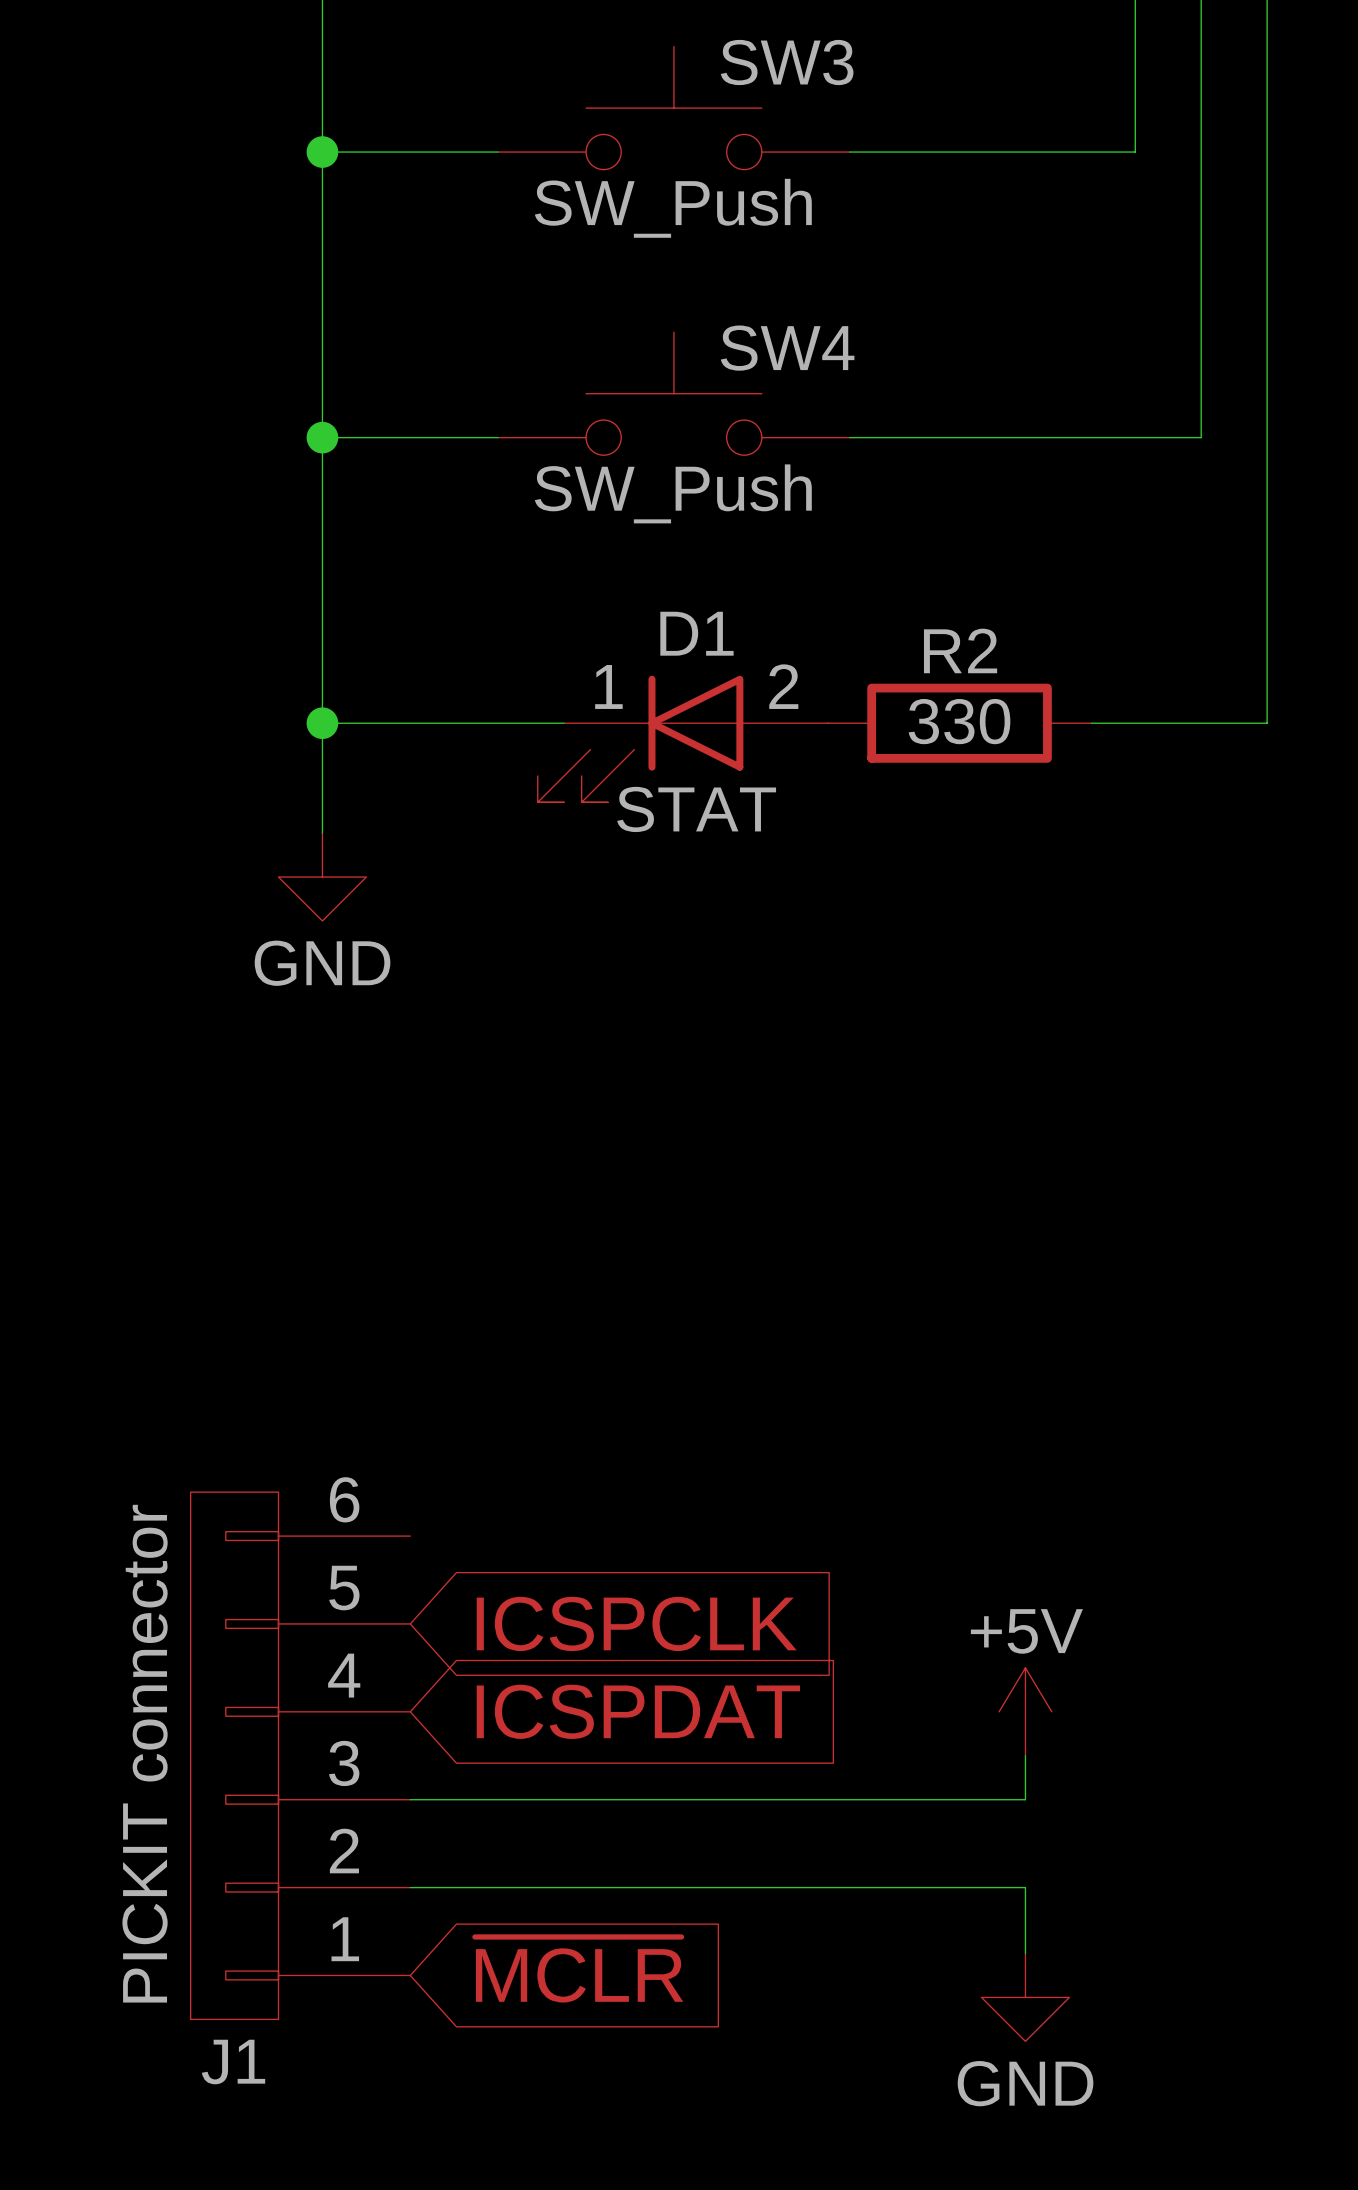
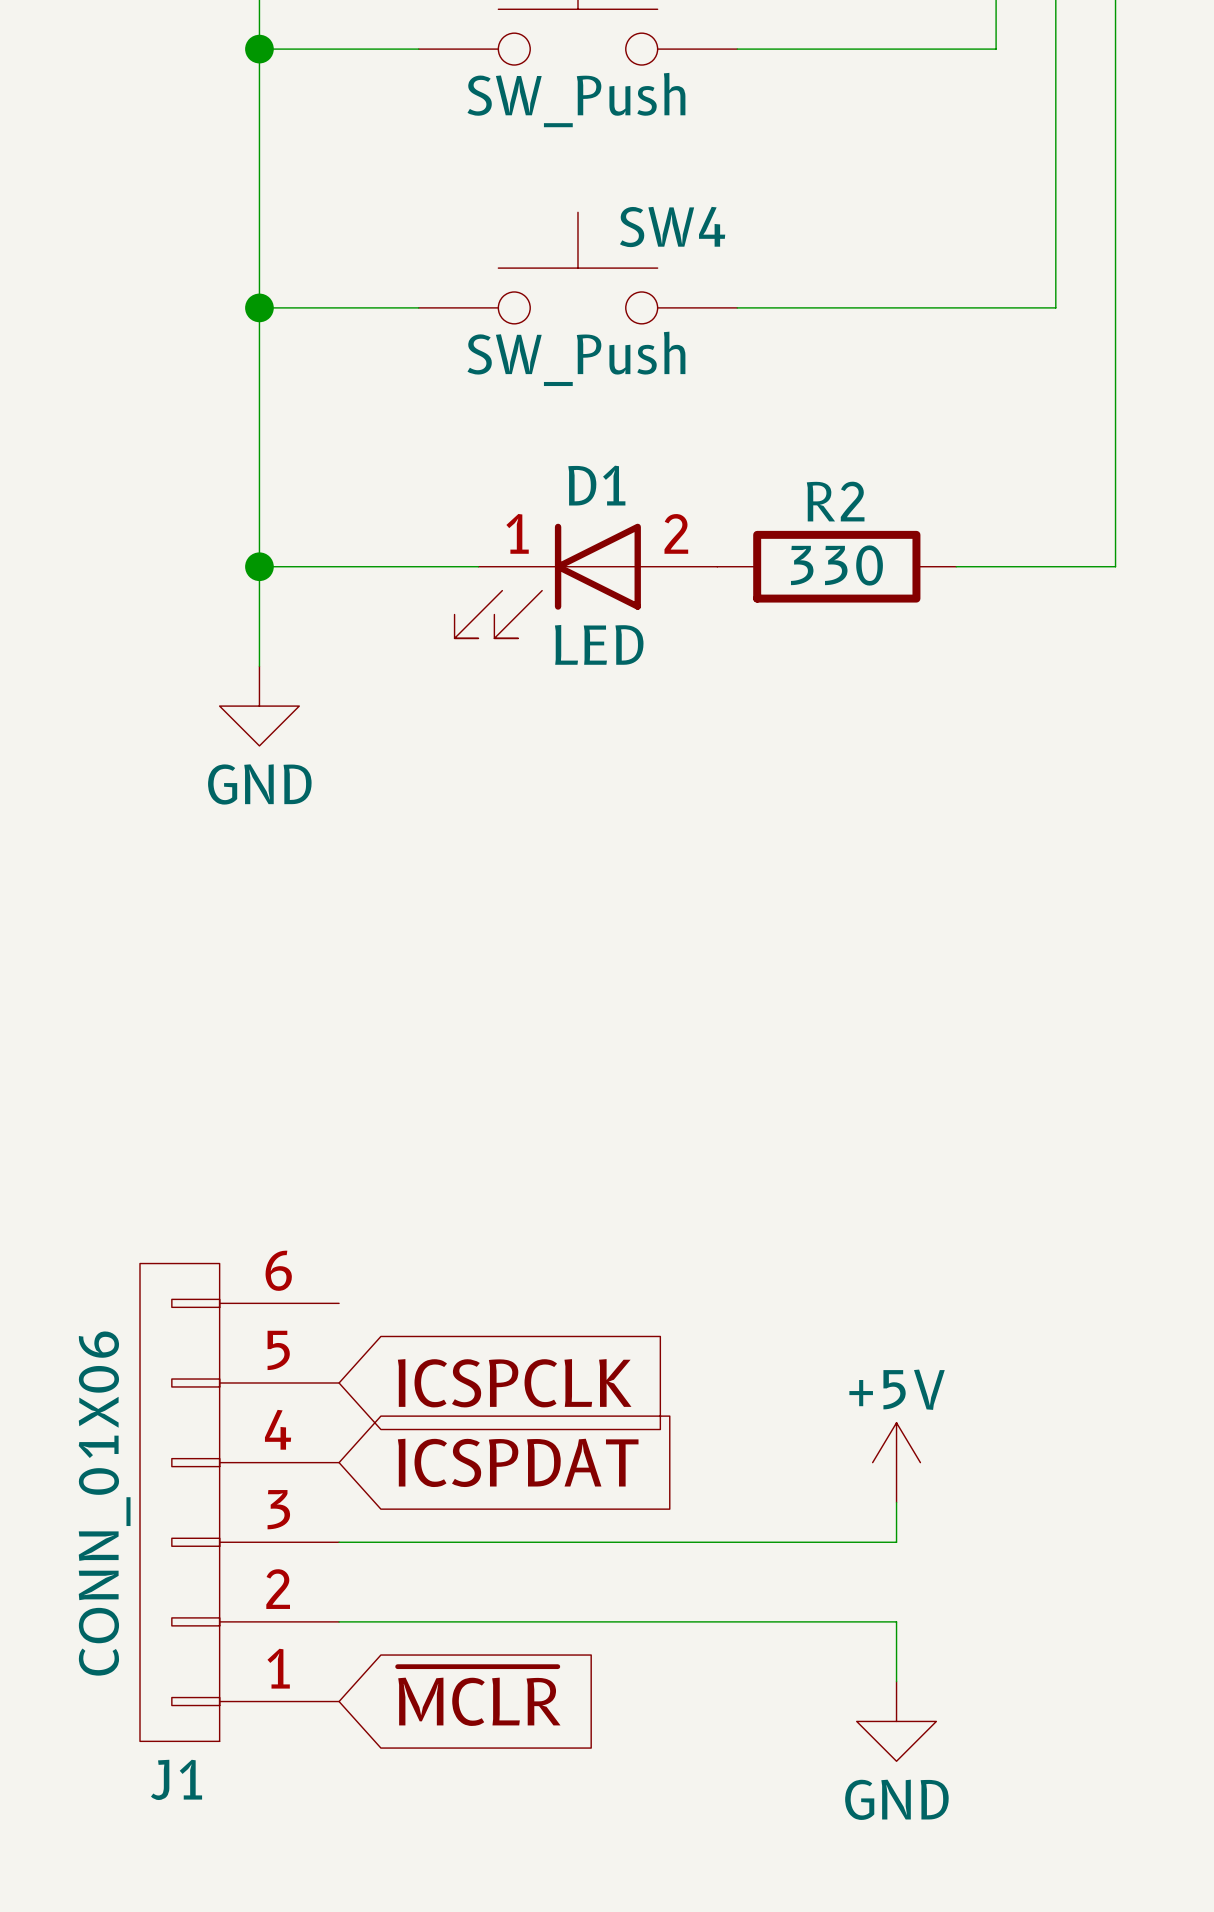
D1 value: STAT (696, 809) -> LED (599, 644)
J1 value: PICKIT connector (145, 1753) -> CONN_01X06 (104, 1503)

